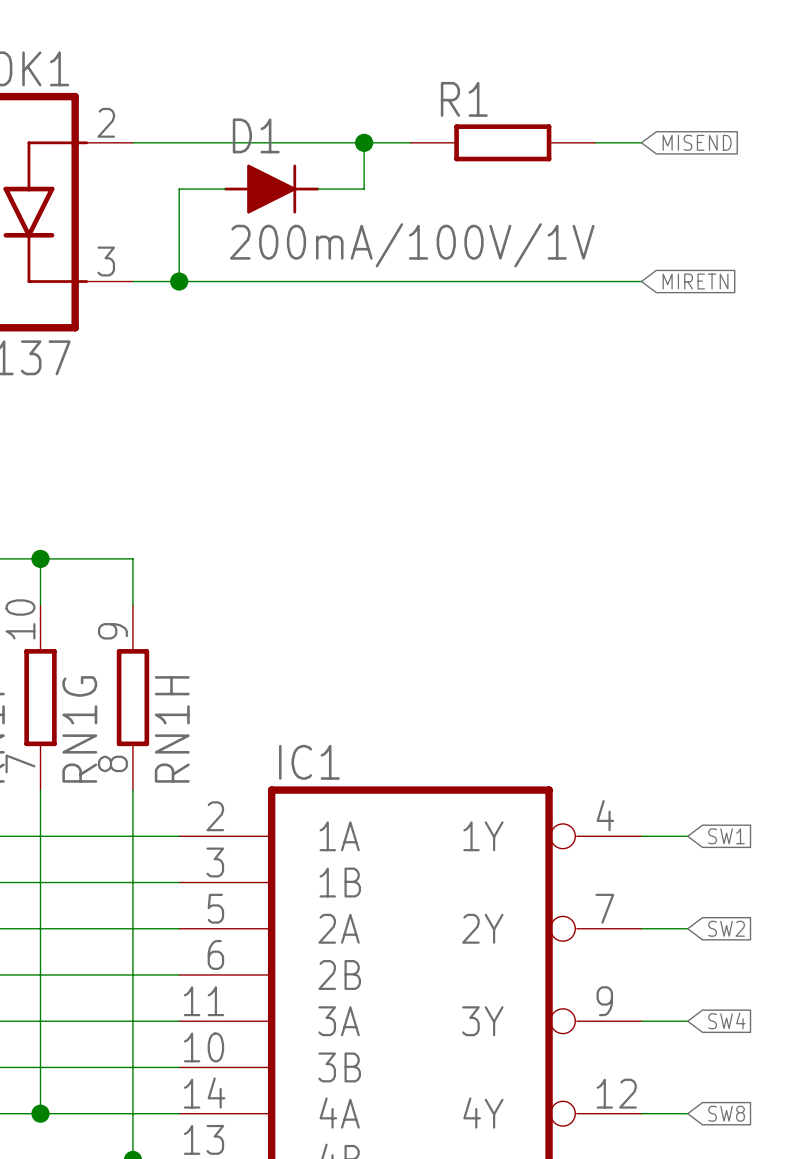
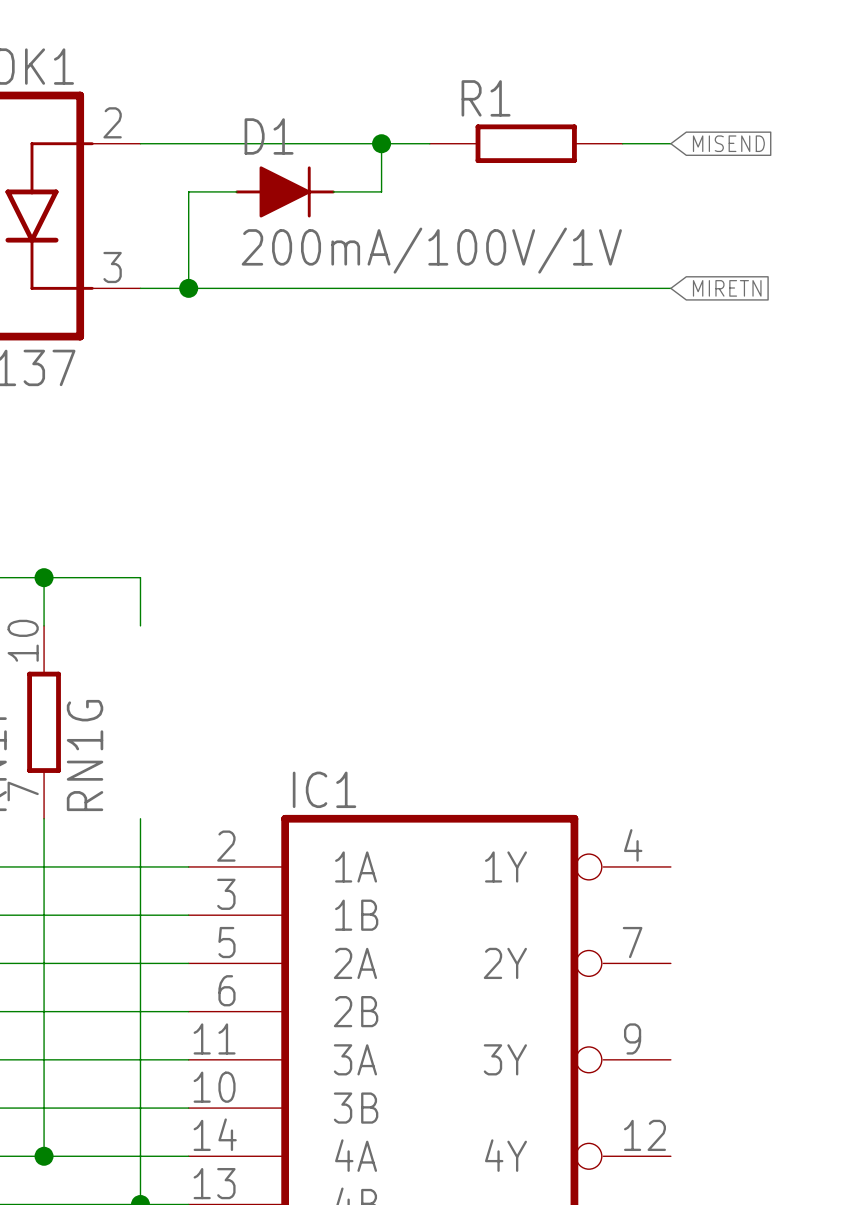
RN1H: (132, 697) -> none
wire: (641, 836) (687, 836) -> none
global label: SW1 (726, 836) -> none
wire: (641, 928) (687, 928) -> none
global label: SW2 (726, 928) -> none
global label: SW4 (726, 1020) -> none
wire: (641, 1021) (687, 1021) -> none
wire: (641, 1113) (687, 1113) -> none
global label: SW8 (726, 1113) -> none

